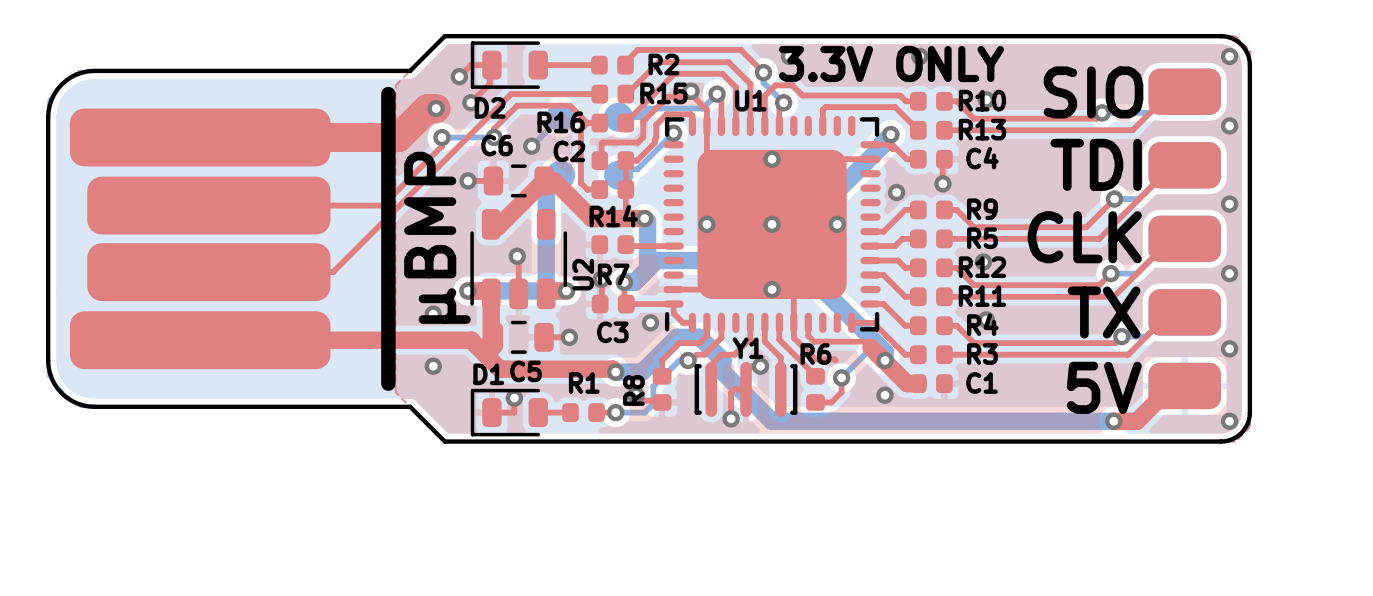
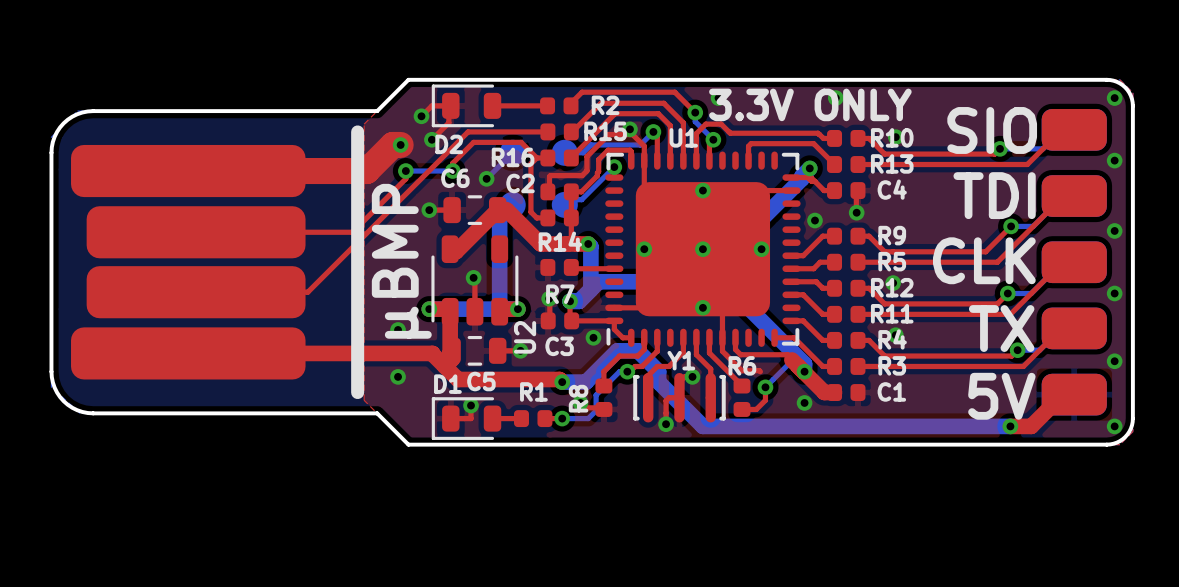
U2 name position: U2 (583, 274) -> U2 (525, 337)

